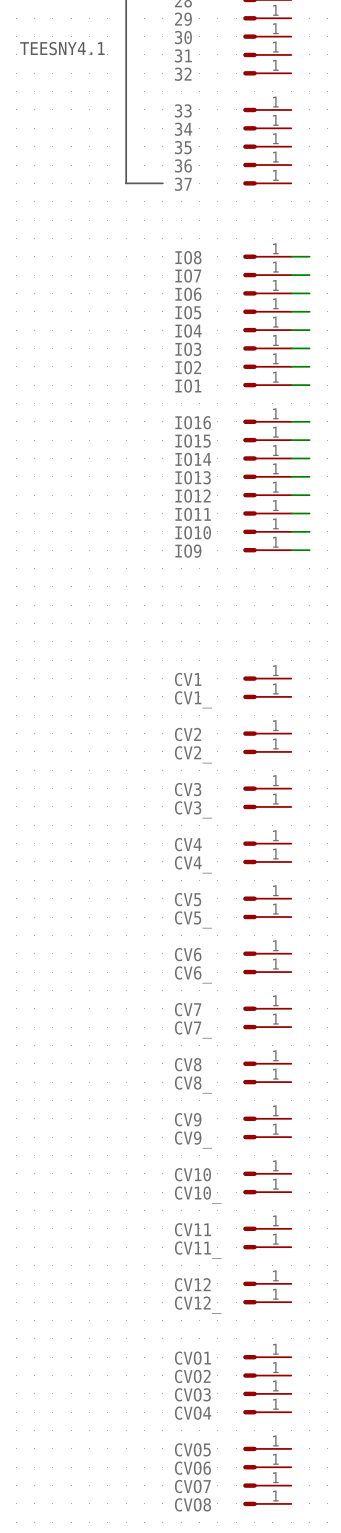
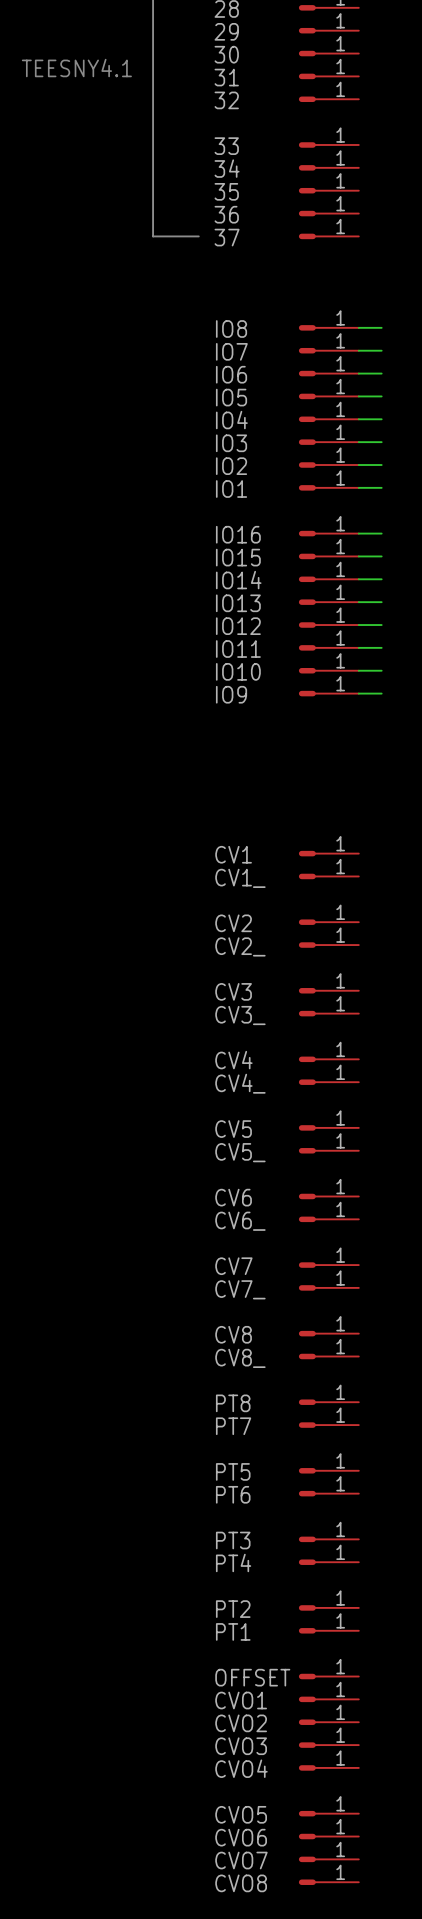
CV9 name: CV9 (188, 1119) -> PT8 (233, 1403)
CV9_ name: CV9_ (193, 1139) -> PT7 (233, 1426)
CV10 name: CV10 (192, 1174) -> PT5 (233, 1471)
CV10_ name: CV10_ (198, 1195) -> PT6 (233, 1494)
CV11 name: CV11 (192, 1229) -> PT3 (233, 1540)
CV11_ name: CV11_ (198, 1250) -> PT4 (233, 1562)
CV12 name: CV12 (192, 1284) -> PT2 (233, 1609)
CV12_ name: CV12_ (198, 1305) -> PT1 (233, 1631)
OFFSET: none -> (328, 1676)

